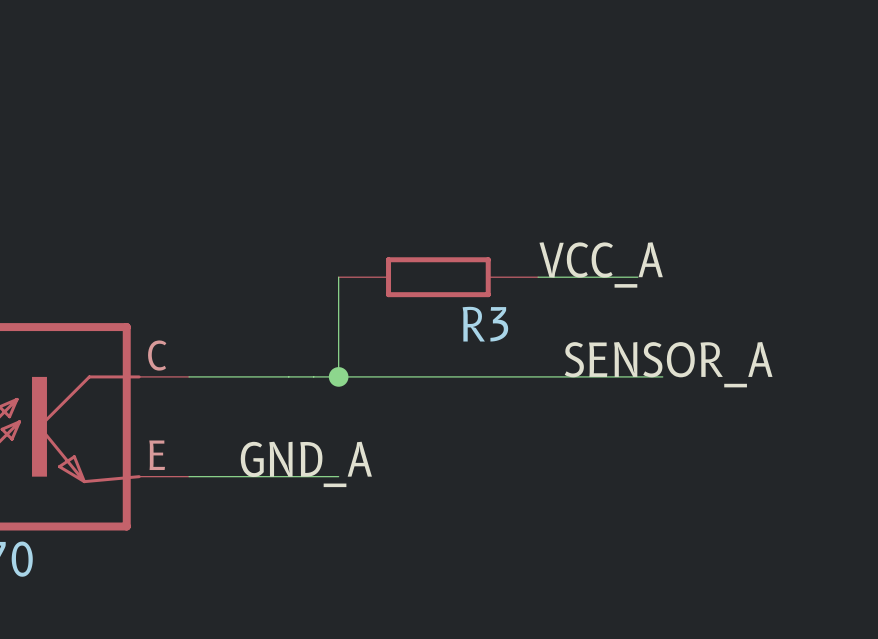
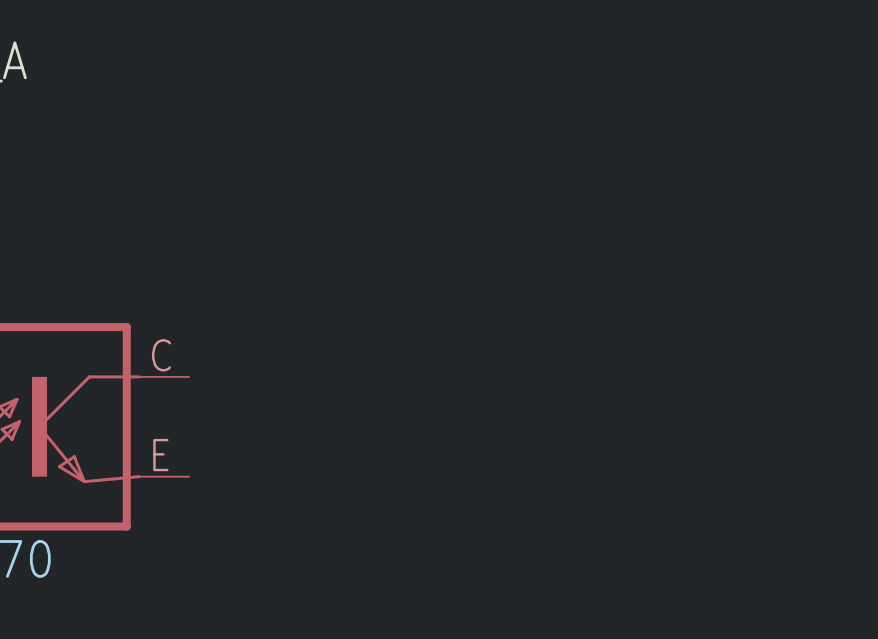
label: VCC_A (601, 264) -> none
wire: (338, 277) (338, 376) -> none
R3: (438, 277) -> none
wire: (538, 277) (637, 277) -> none
label: SENSOR_A (668, 364) -> none
wire: (189, 376) (662, 376) -> none
junction: (338, 376) -> none
label: GND_A (306, 464) -> none
wire: (189, 476) (338, 476) -> none

